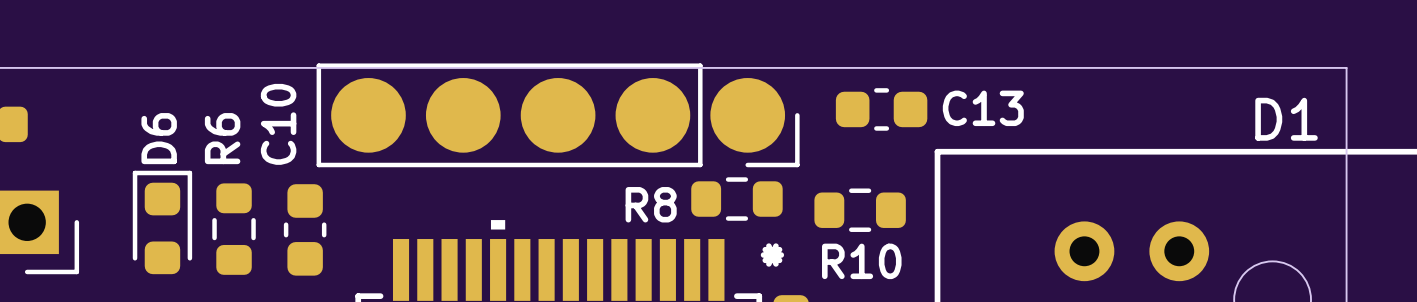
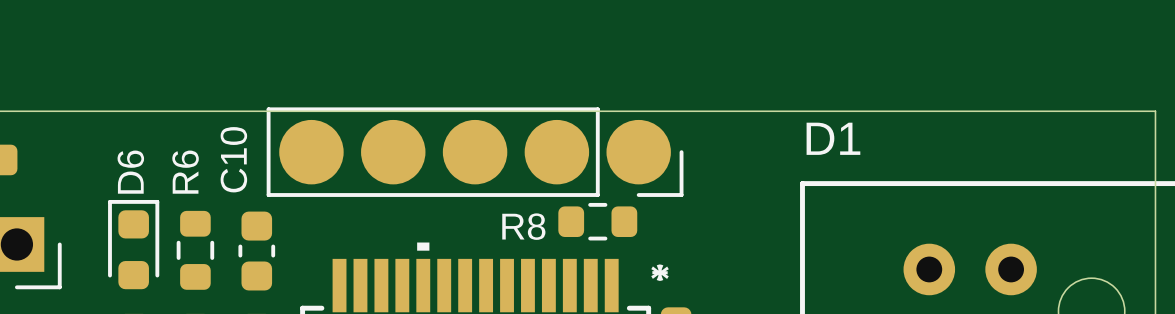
C13: (881, 109) -> none
D1 name position: D1 (1286, 119) -> D1 (833, 138)
R8 position: (736, 199) -> (597, 221)
R10: (860, 210) -> none

